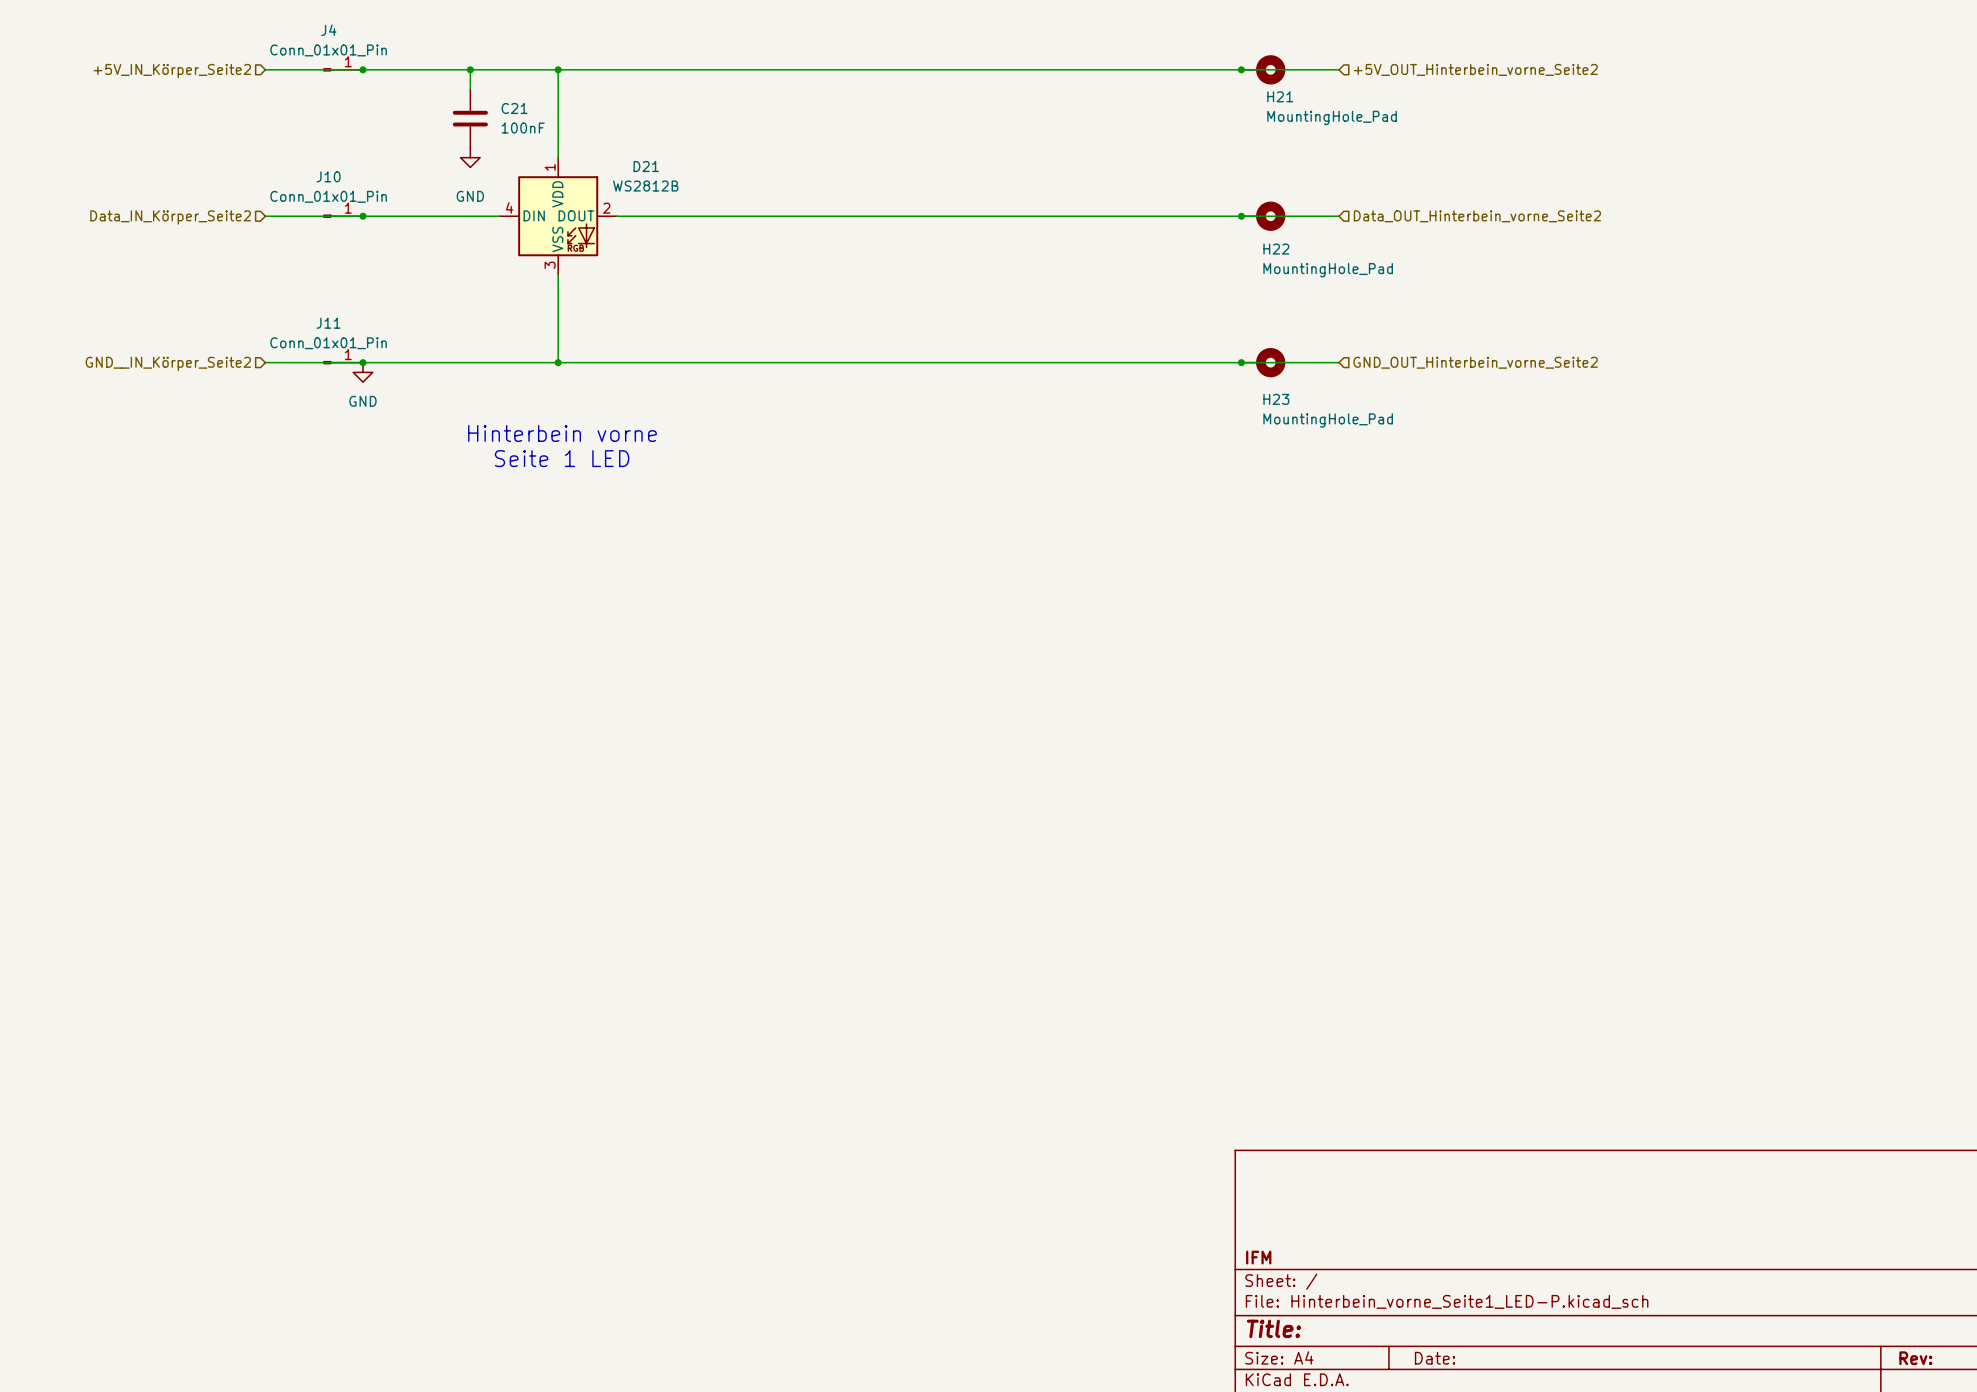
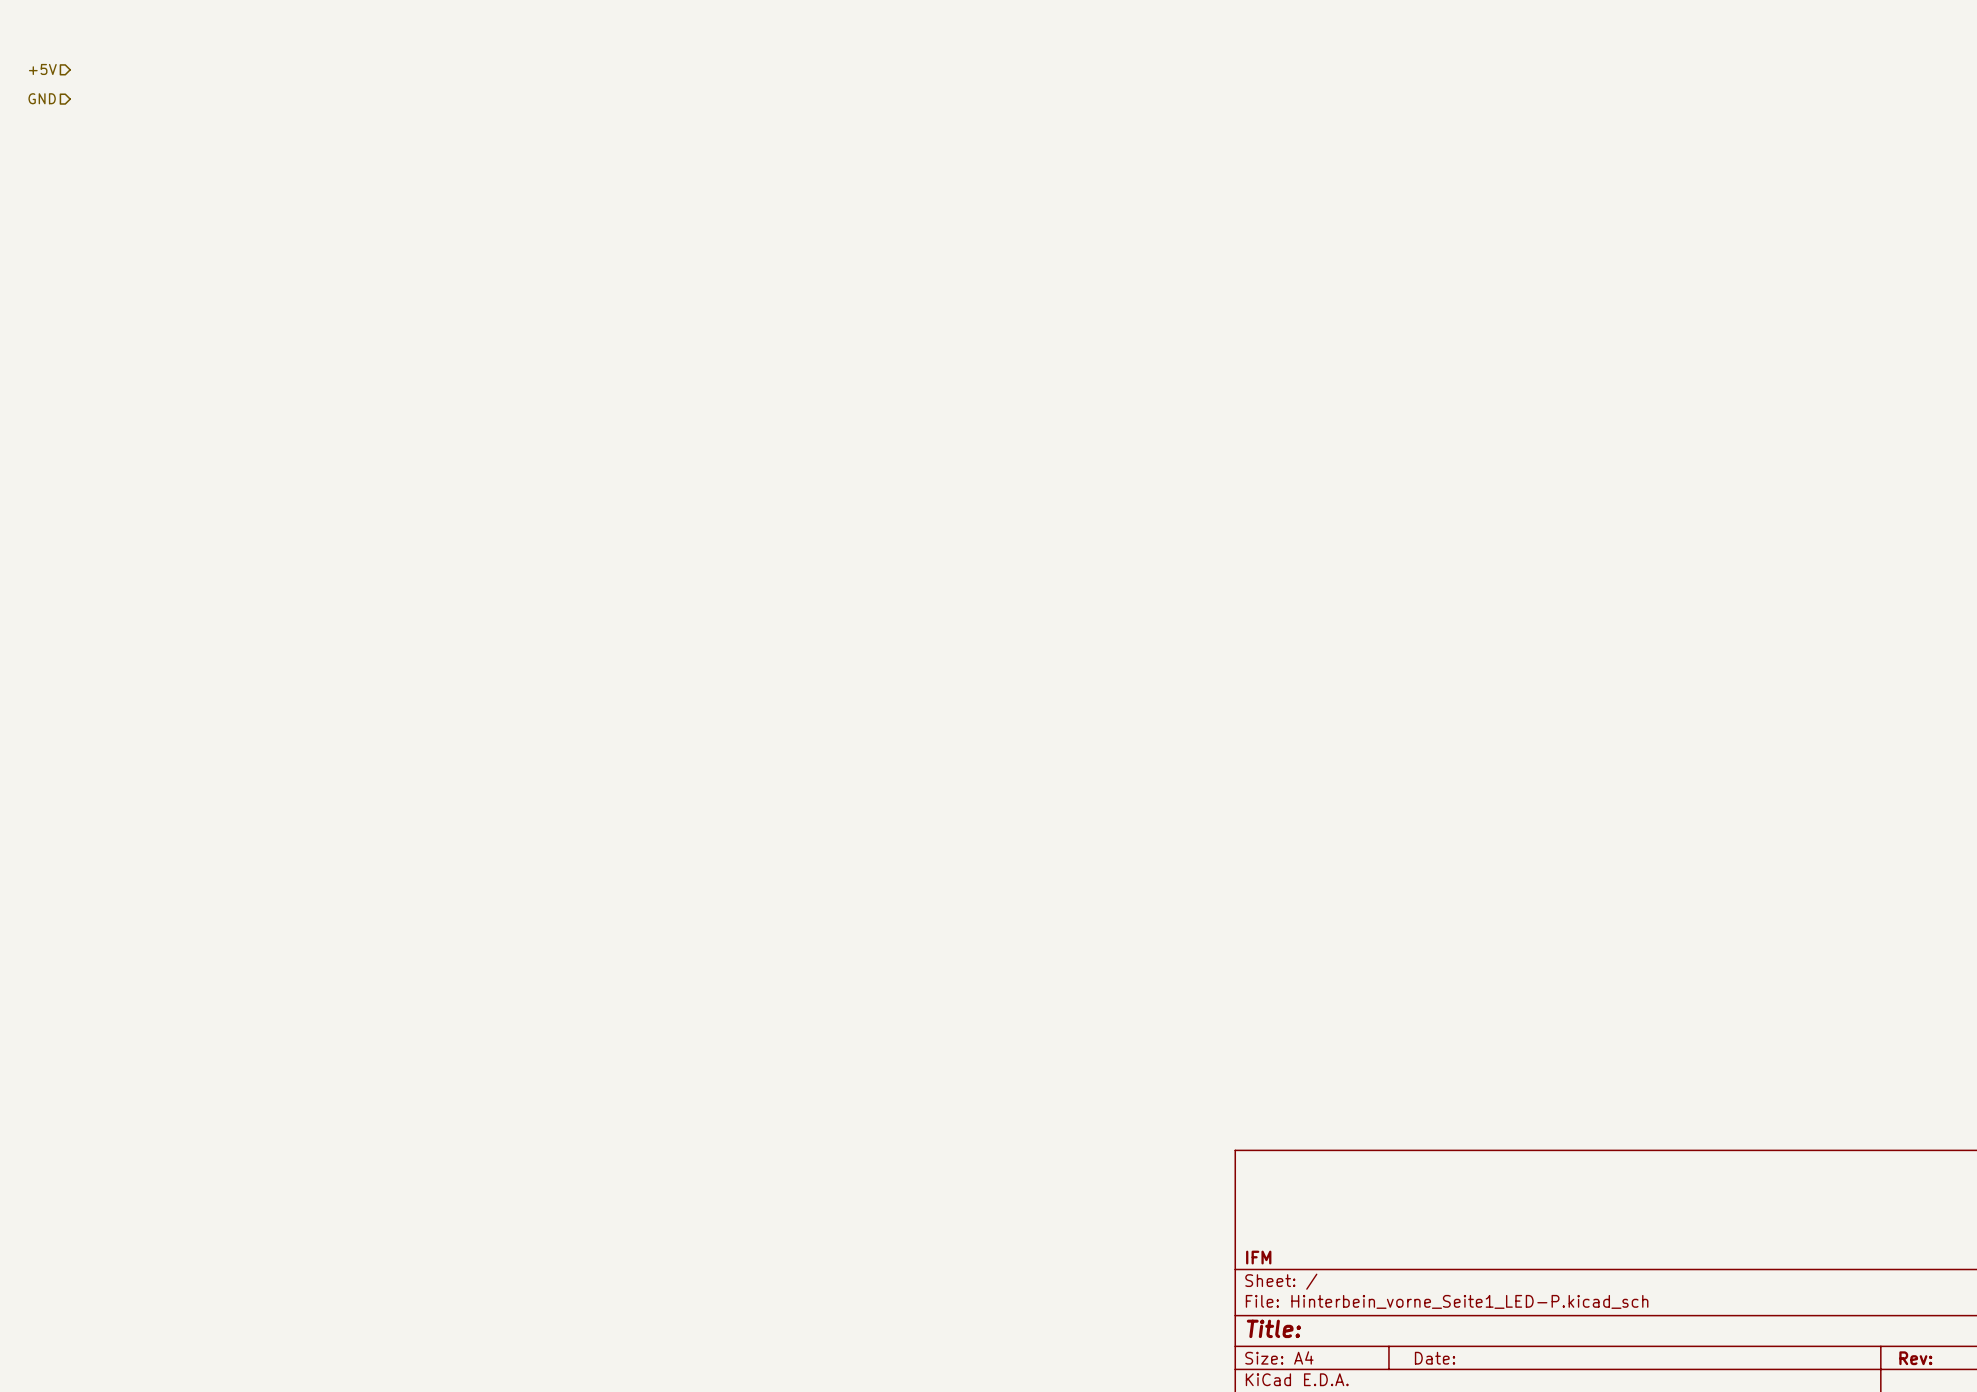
hierarchical label: none -> +5V (42, 69)
wire: (265, 69) (1339, 69) -> none
J4: Conn_01x01_Pin (343, 69) -> none
junction: (362, 69) -> none
wire: (470, 69) (470, 89) -> none
junction: (470, 69) -> none
wire: (558, 69) (558, 157) -> none
junction: (558, 69) -> none
junction: (1241, 69) -> none
H21: MountingHole_Pad (1263, 69) -> none
hierarchical label: +5V_OUT_Hinterbein_vorne_Seite2 (1475, 69) -> none
hierarchical label: +5V_IN_Körper_Seite2 (172, 71) -> none
hierarchical label: none -> GND (42, 98)
C21: 100nF (470, 118) -> none
power symbol: GND (470, 157) -> none
wire: (265, 216) (499, 216) -> none
J10: Conn_01x01_Pin (343, 216) -> none
junction: (362, 216) -> none
D21: WS2812B (558, 216) -> none
wire: (616, 216) (1339, 216) -> none
junction: (1241, 216) -> none
H22: MountingHole_Pad (1263, 216) -> none
hierarchical label: Data_OUT_Hinterbein_vorne_Seite2 (1477, 216) -> none
hierarchical label: Data_IN_Körper_Seite2 (170, 217) -> none
wire: (558, 274) (558, 362) -> none
wire: (265, 362) (1339, 362) -> none
J11: Conn_01x01_Pin (343, 362) -> none
junction: (362, 362) -> none
junction: (558, 362) -> none
junction: (1241, 362) -> none
H23: MountingHole_Pad (1263, 362) -> none
hierarchical label: GND_OUT_Hinterbein_vorne_Seite2 (1475, 362) -> none
hierarchical label: GND__IN_Körper_Seite2 (168, 363) -> none
power symbol: GND (362, 372) -> none
text: Hinterbein vorne (562, 433) -> none
text: Seite 1 LED (562, 458) -> none

